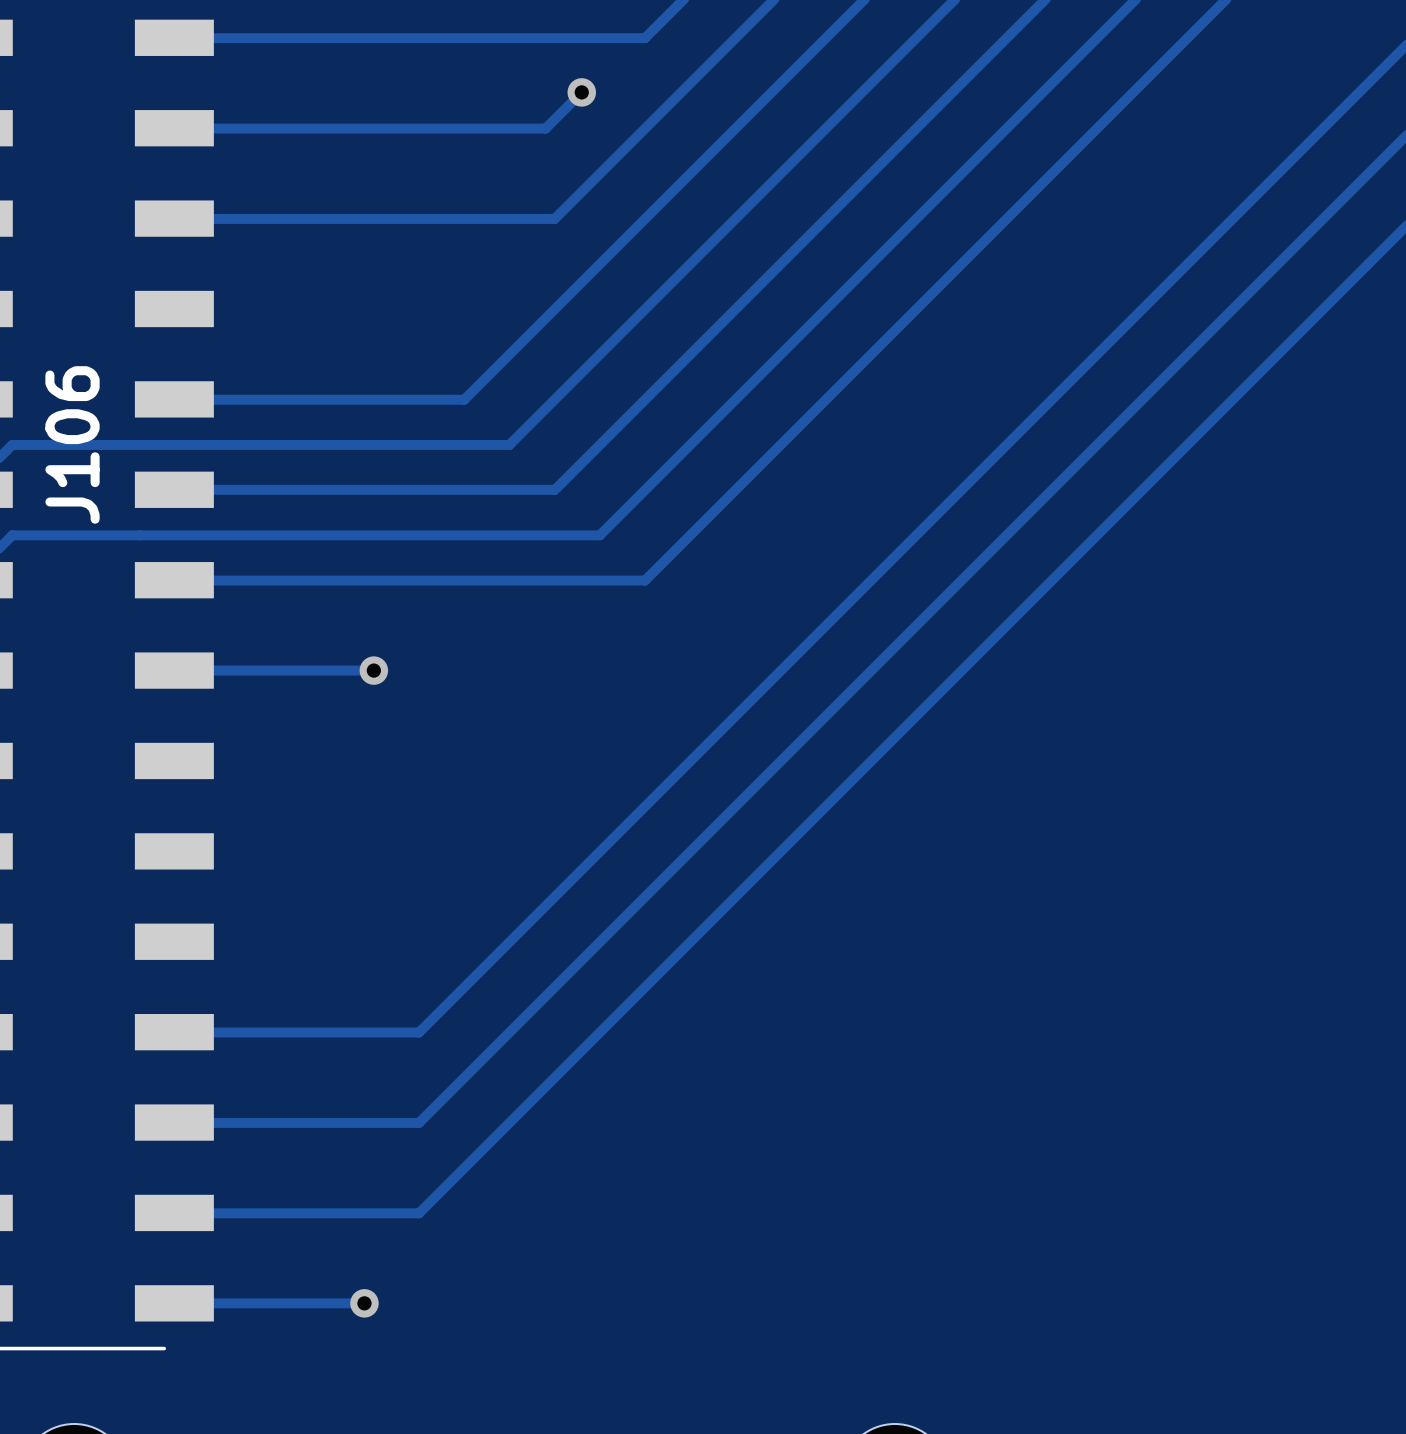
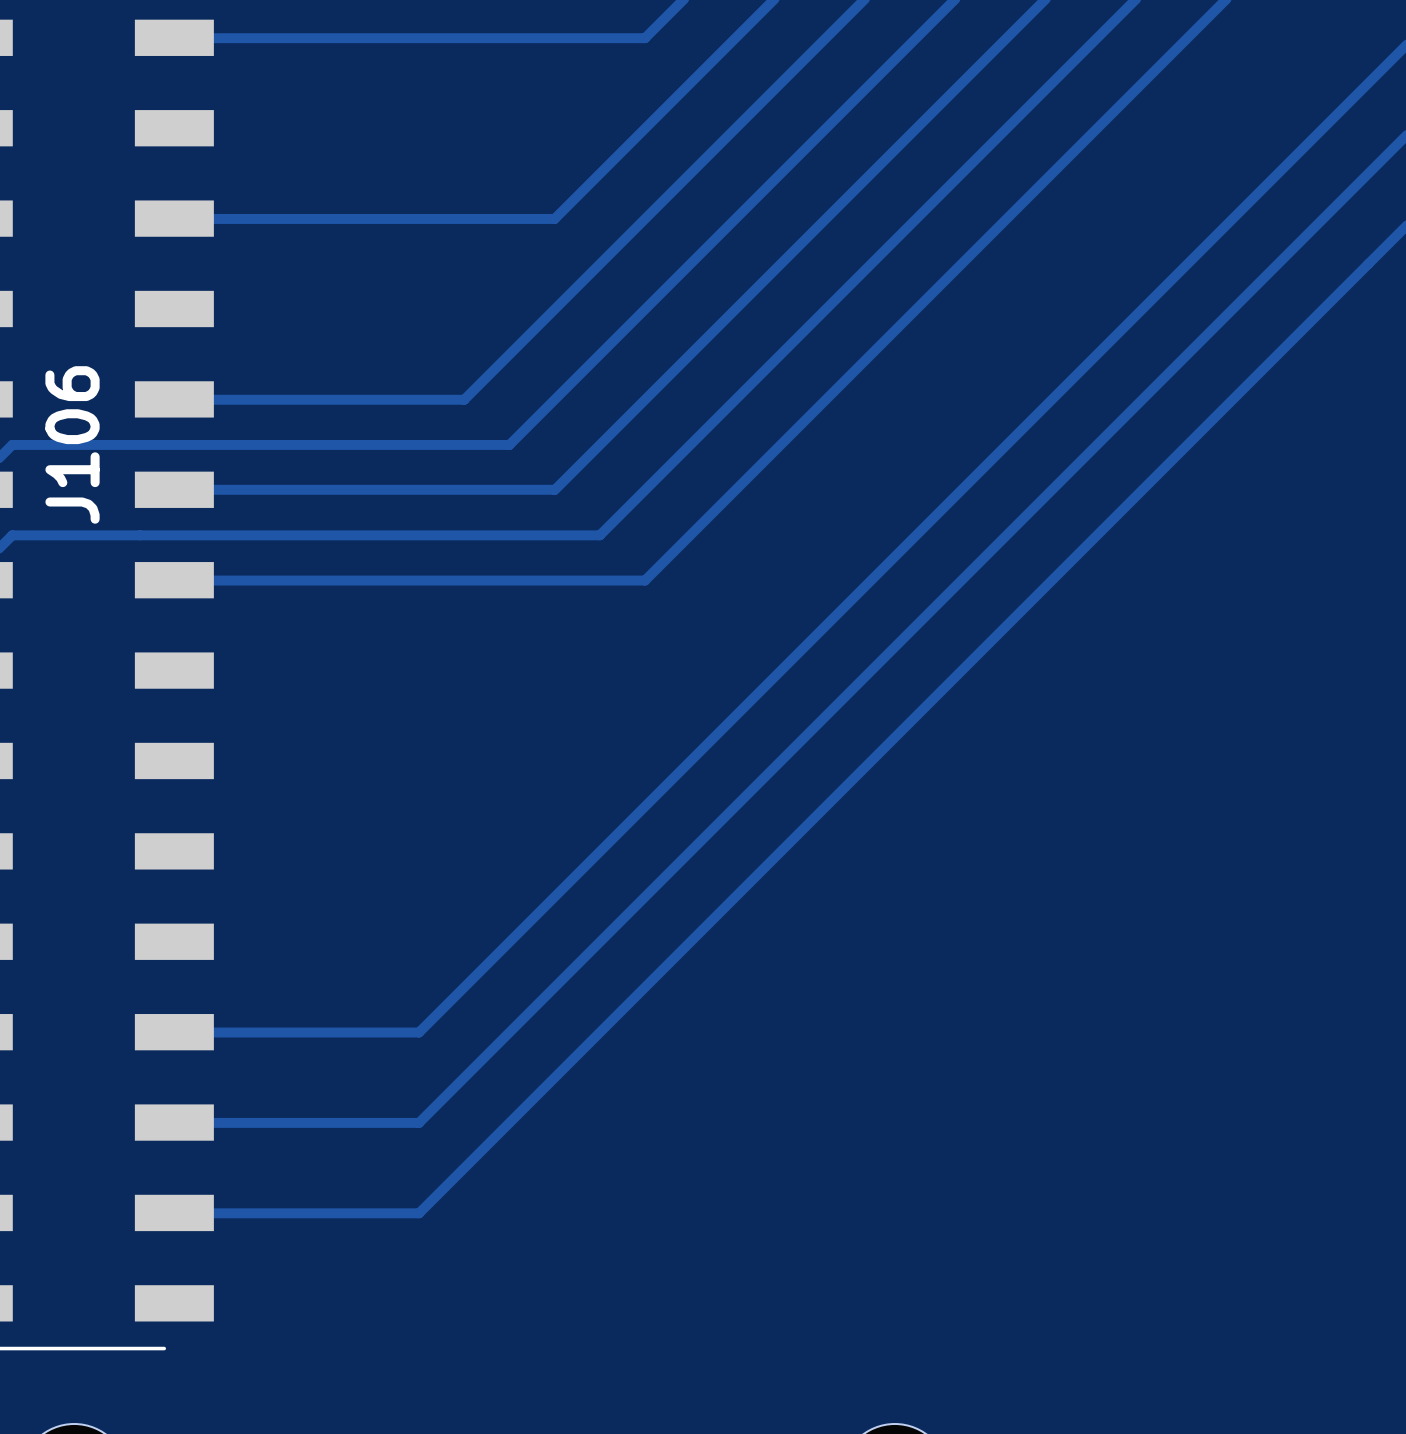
track: (581, 92) (545, 128) (193, 128) -> none
via: (581, 92) -> none
track: (174, 670) (373, 670) -> none
via: (373, 670) -> none
track: (174, 1303) (364, 1303) -> none
via: (364, 1303) -> none

